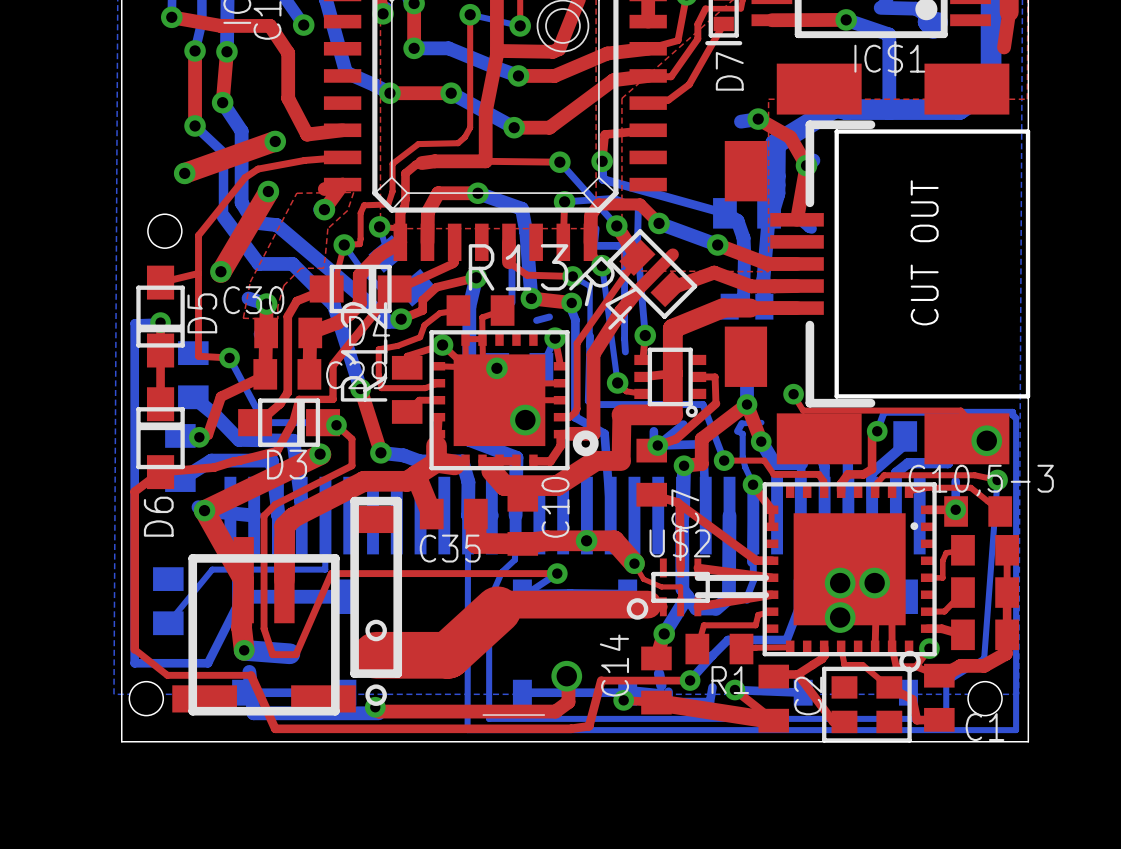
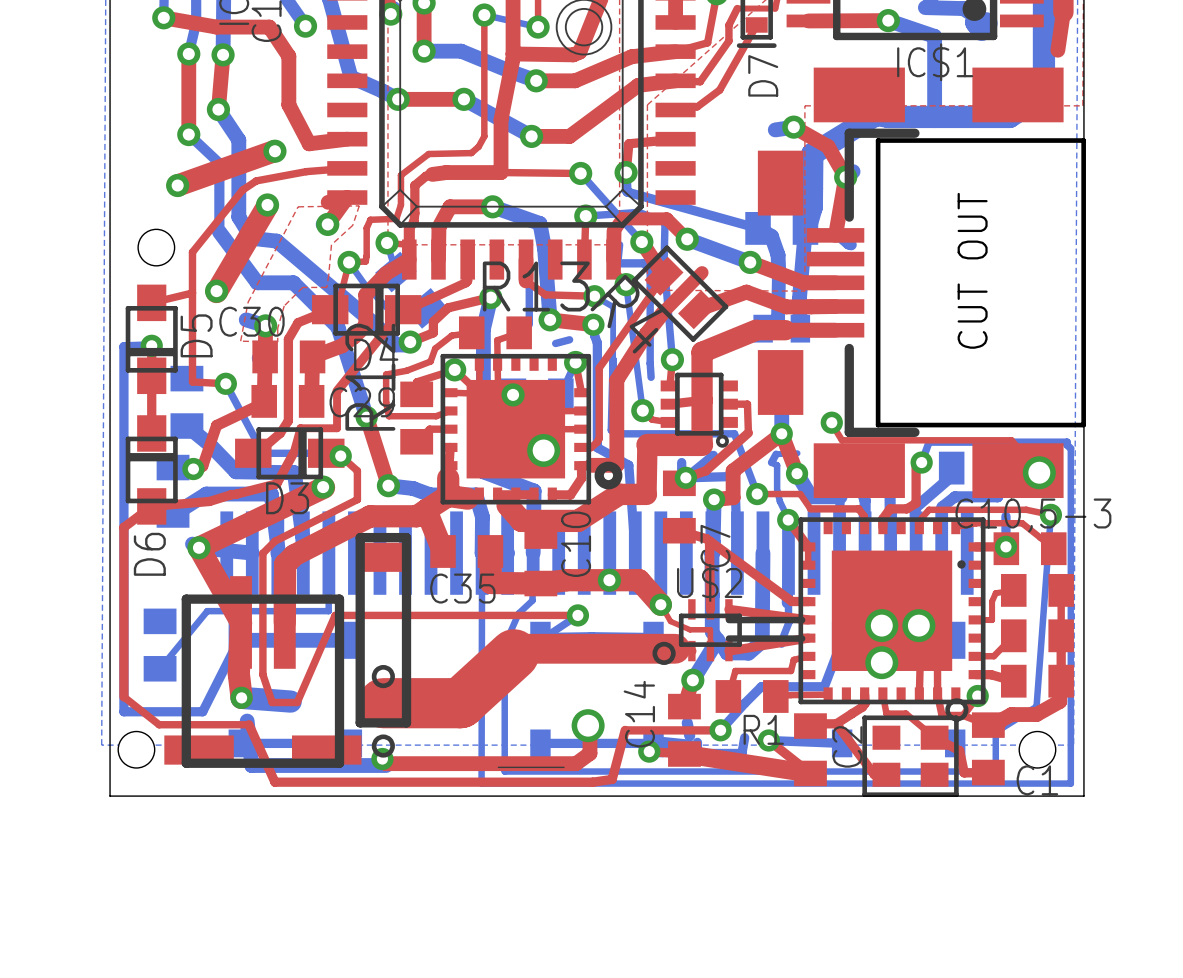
top track: (465, 339) (482, 339) -> none

